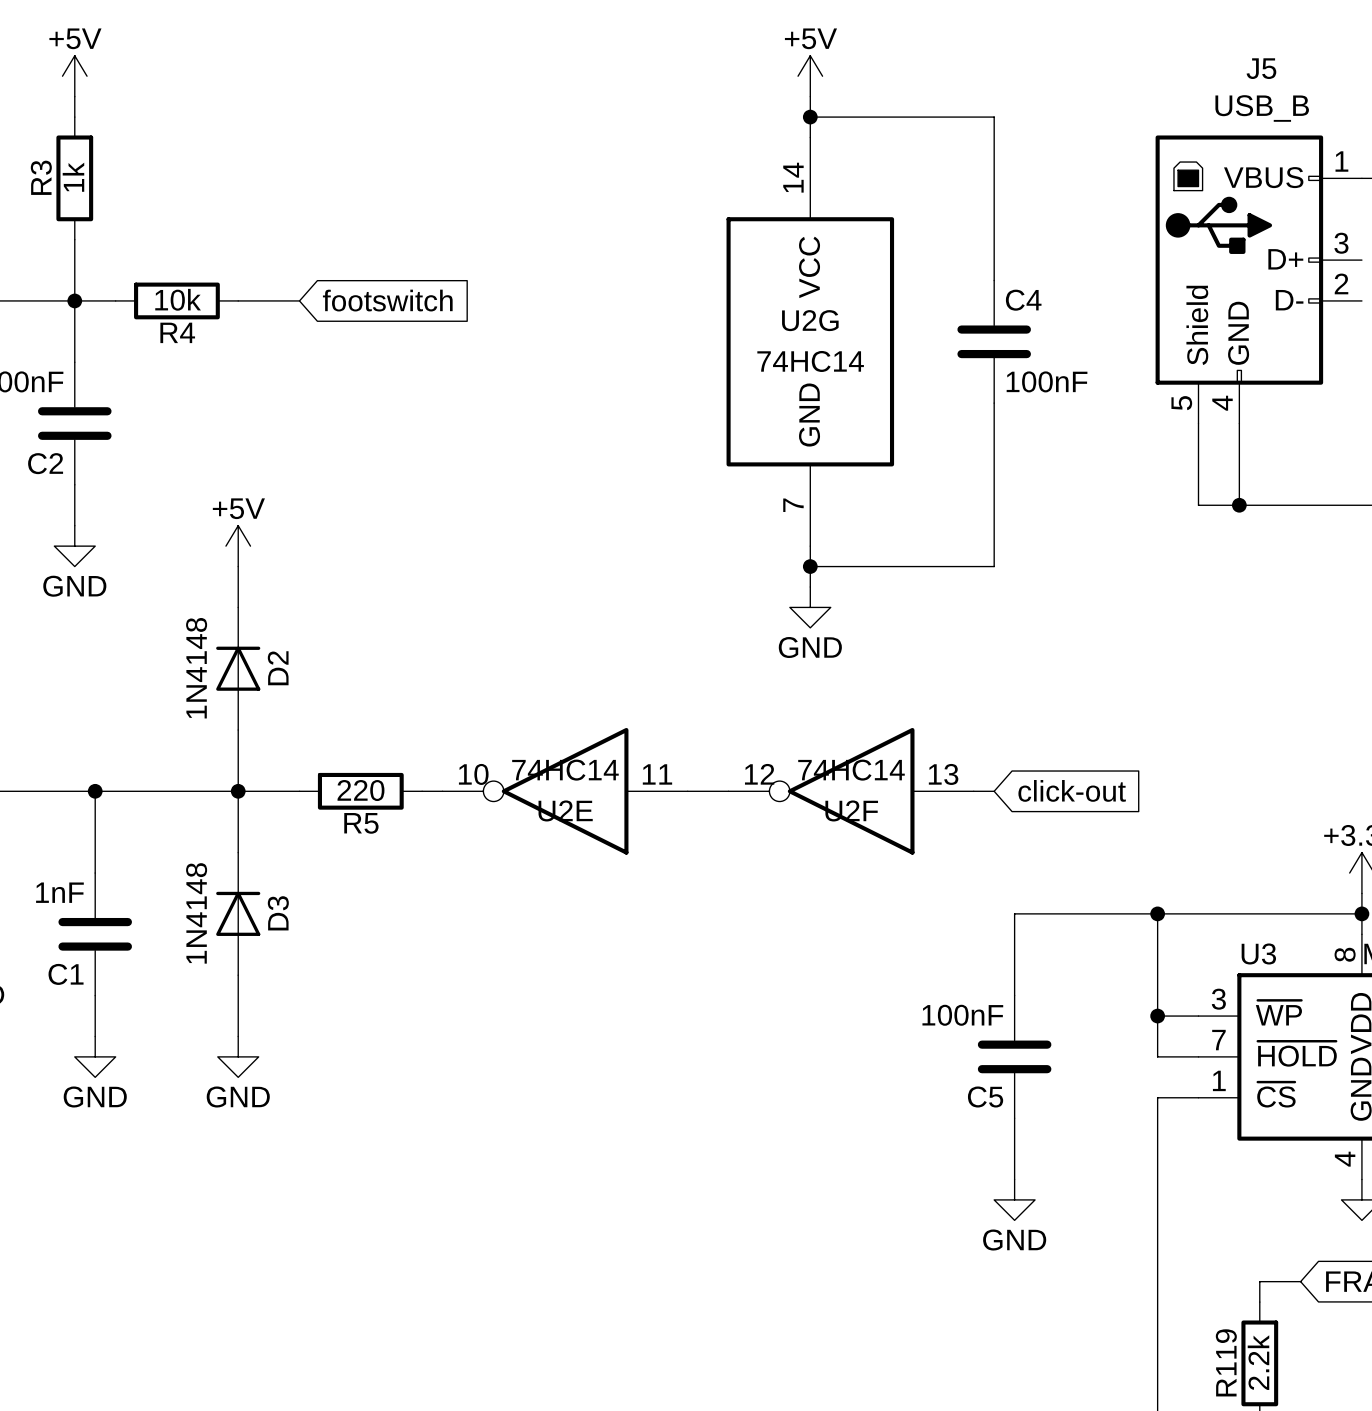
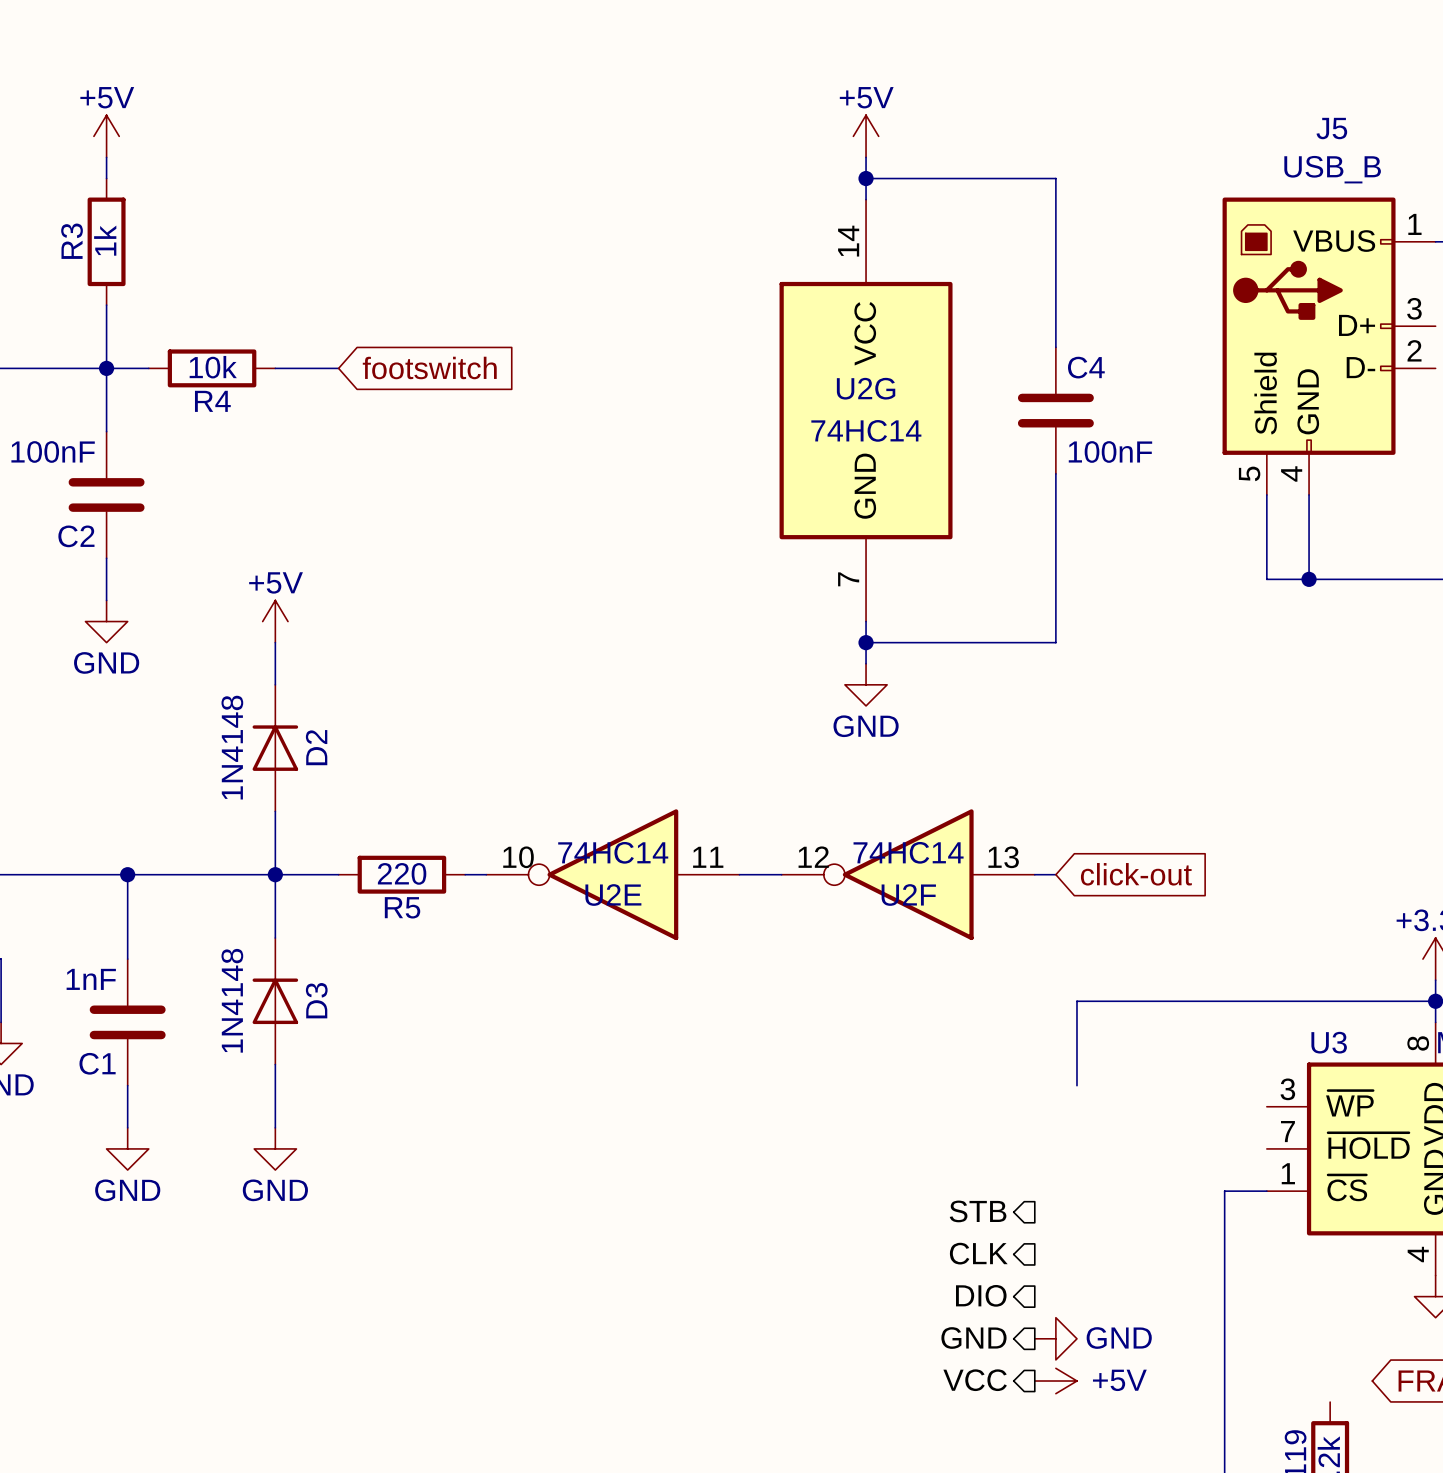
wire: (1157, 913) (1157, 1056) (1198, 1056) -> none
junction: (1157, 913) -> none
wire: (1157, 1016) (1198, 1016) -> none
junction: (1157, 1016) -> none
C5: 100nF (1014, 1056) -> none
sheet pin: none -> STB (978, 1211)
wire: (1014, 1118) (1014, 1179) -> none
sheet pin: none -> CLK (978, 1253)
sheet pin: none -> DIO (981, 1295)
power symbol rotation: 0° (1014, 1199) -> 90° counterclockwise (1055, 1338)
power symbol position: GND (1014, 1199) -> GND (1055, 1338)
sheet pin: none -> GND (973, 1338)
sheet pin: none -> VCC (975, 1380)
power symbol: none -> +5V (1055, 1381)
wire: (1300, 1281) (1259, 1281) (1259, 1302) -> none

